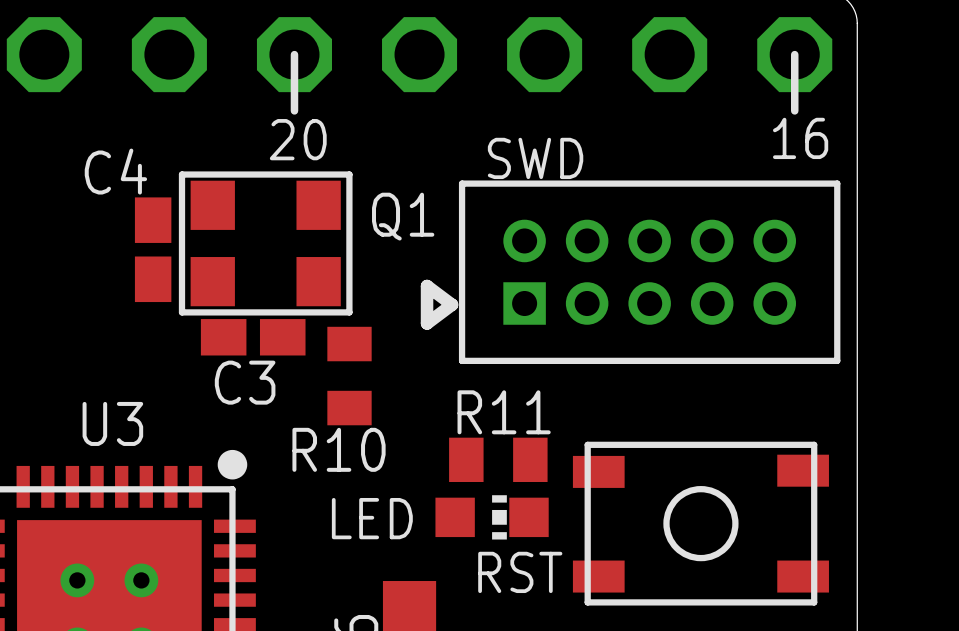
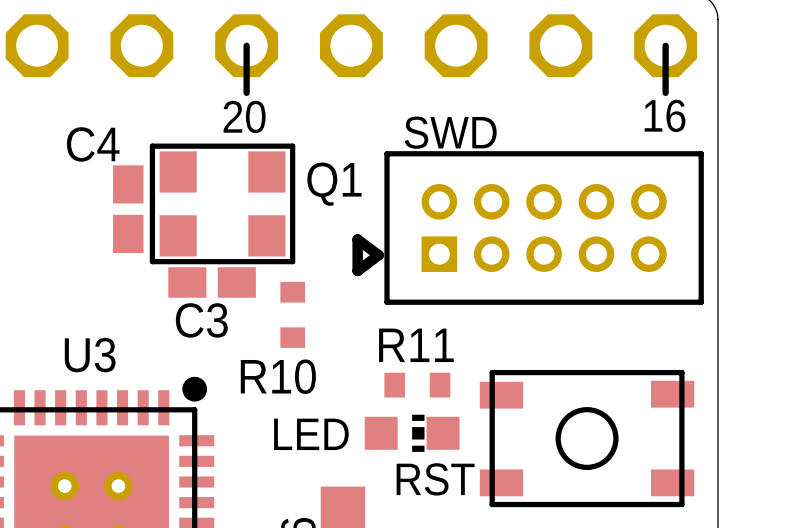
R10 footprint: [327, 326, 372, 426] -> [280, 281, 306, 348]
R11 footprint: [449, 437, 548, 482] -> [384, 372, 451, 398]

